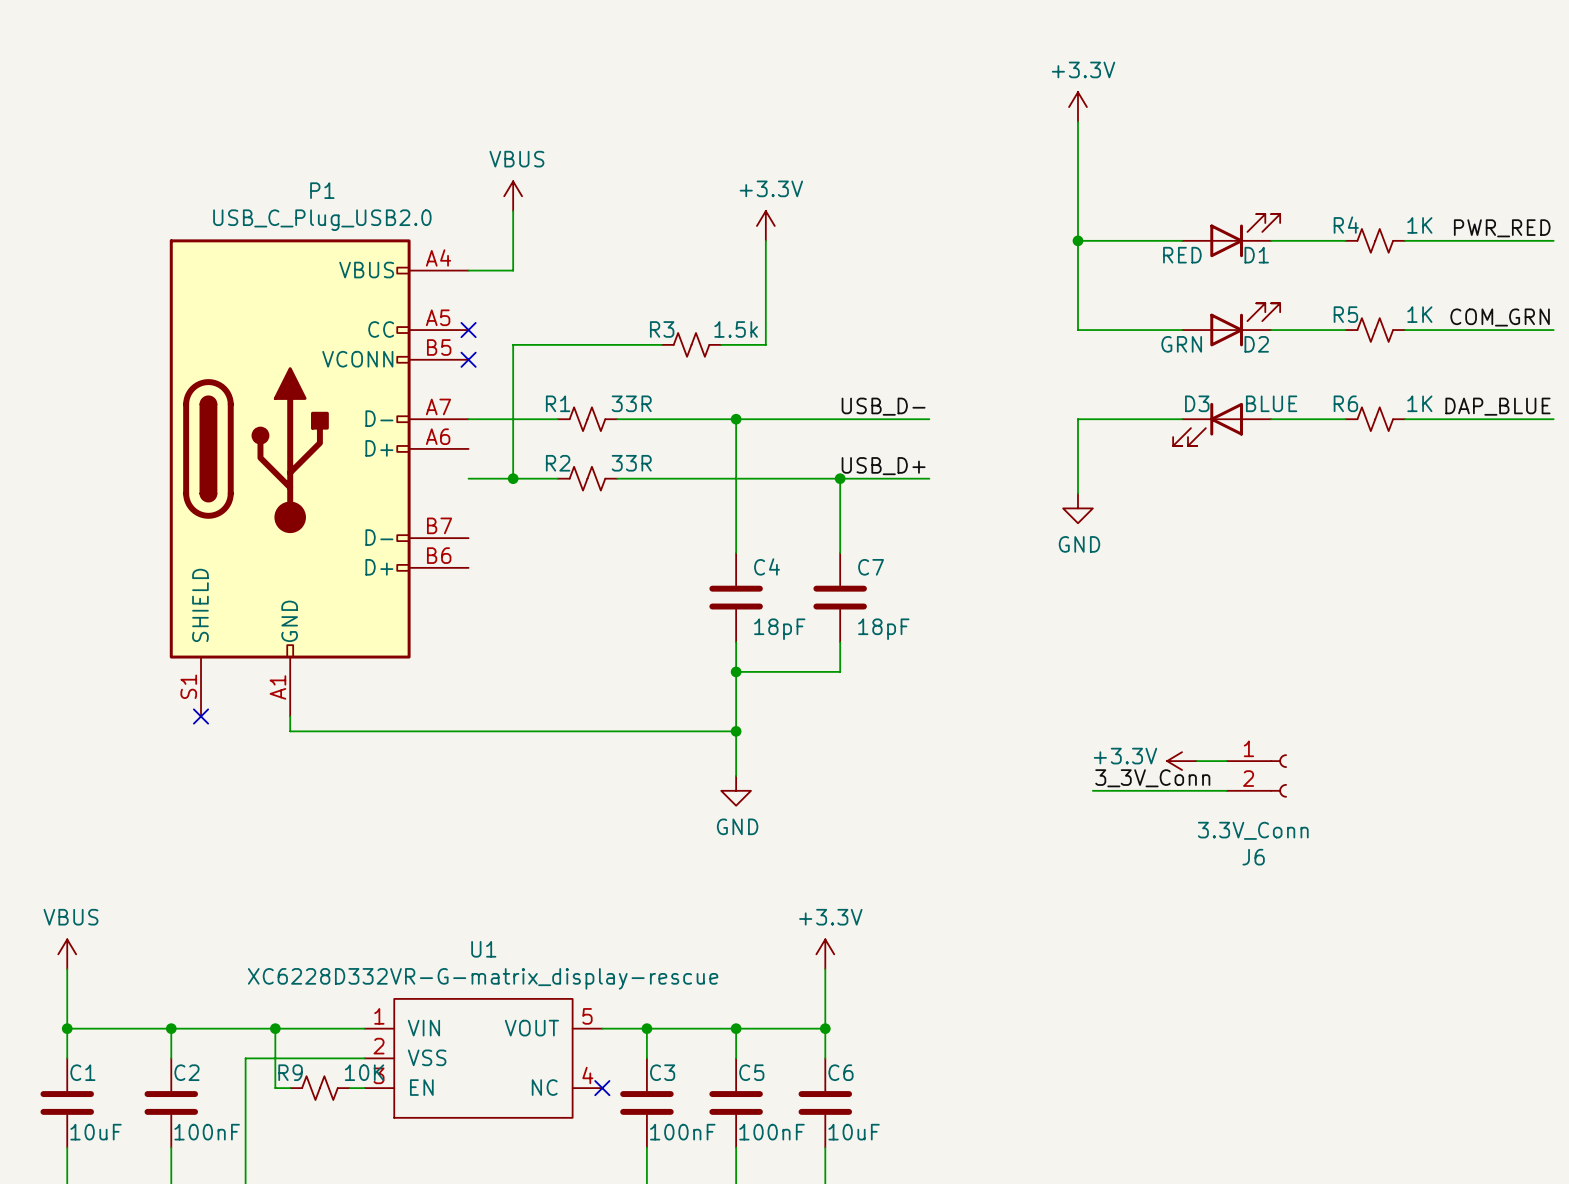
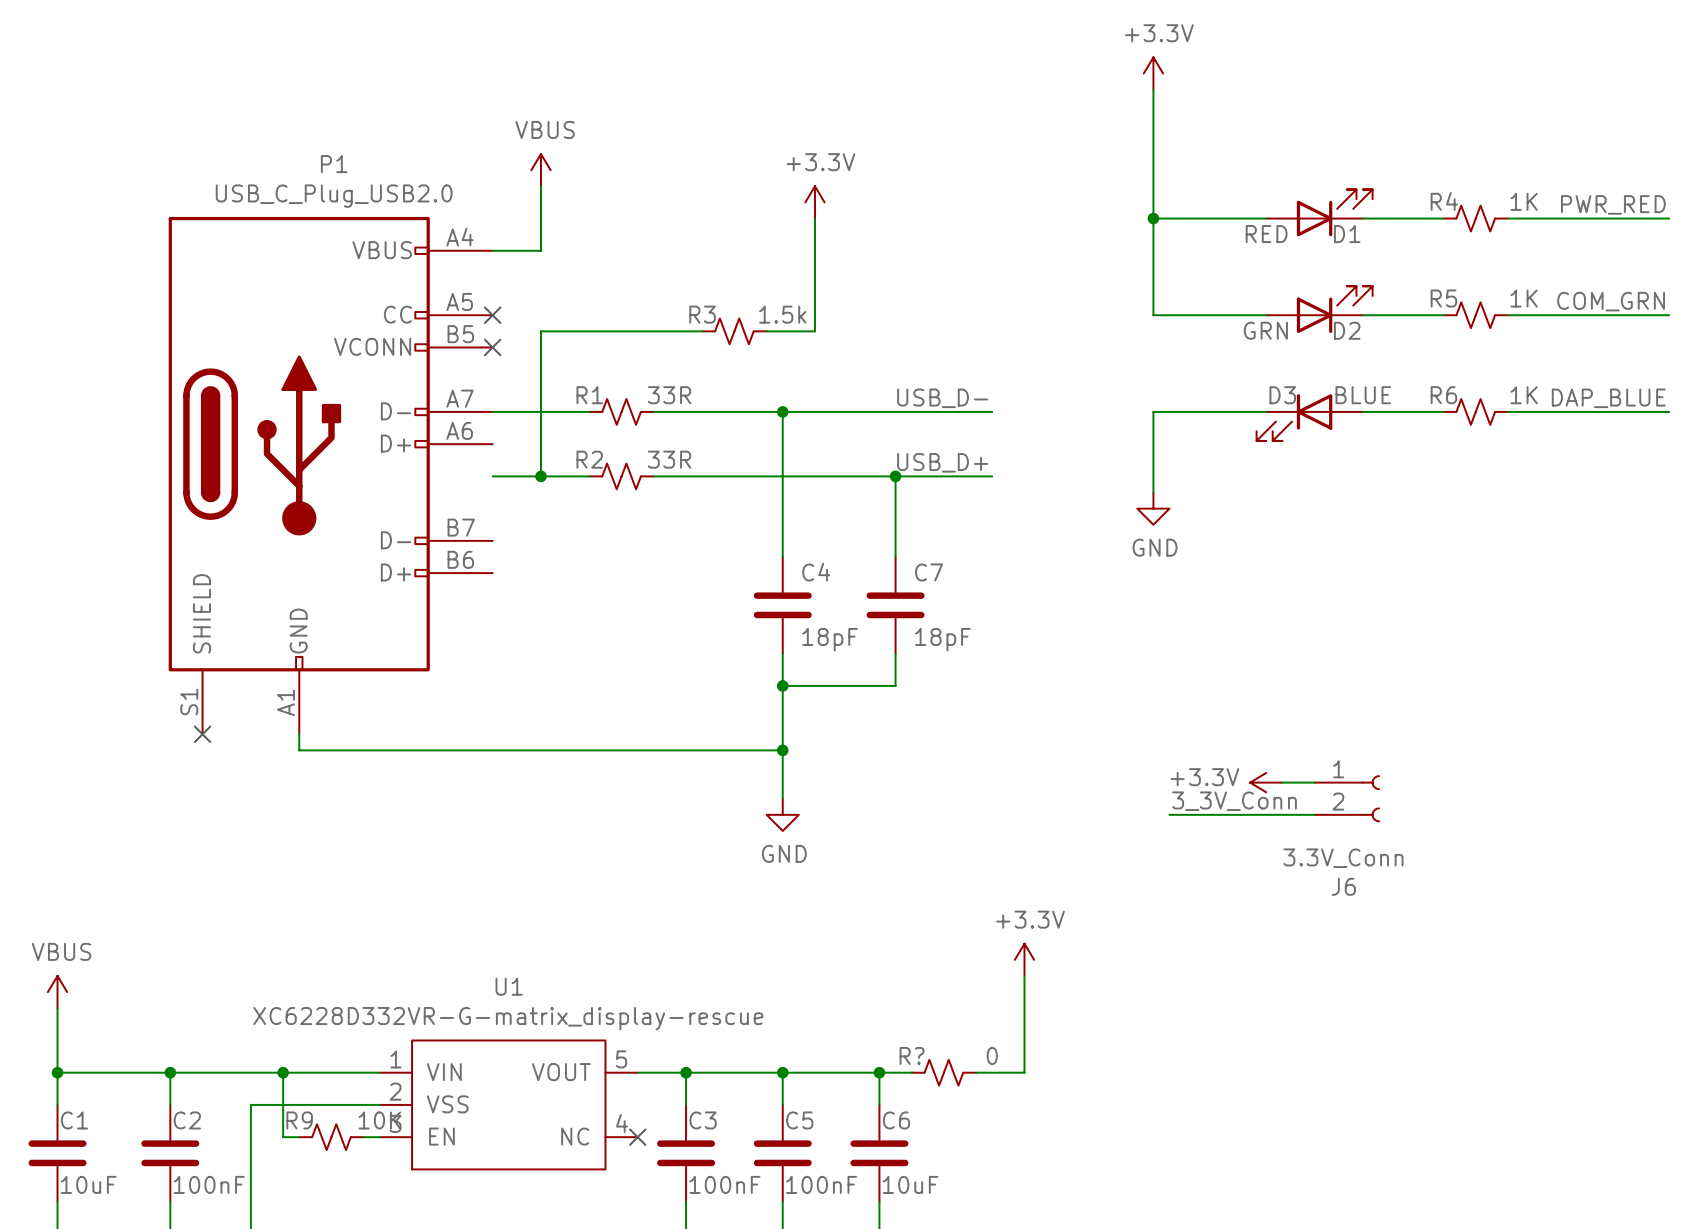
wire: none -> (1024, 976) (1024, 1072) (976, 1072)
power symbol position: +3.3V (825, 954) -> +3.3V (1024, 959)
wire: (825, 969) (825, 1028) -> (911, 1072) (879, 1072)
R?: none -> 0 (943, 1072)

